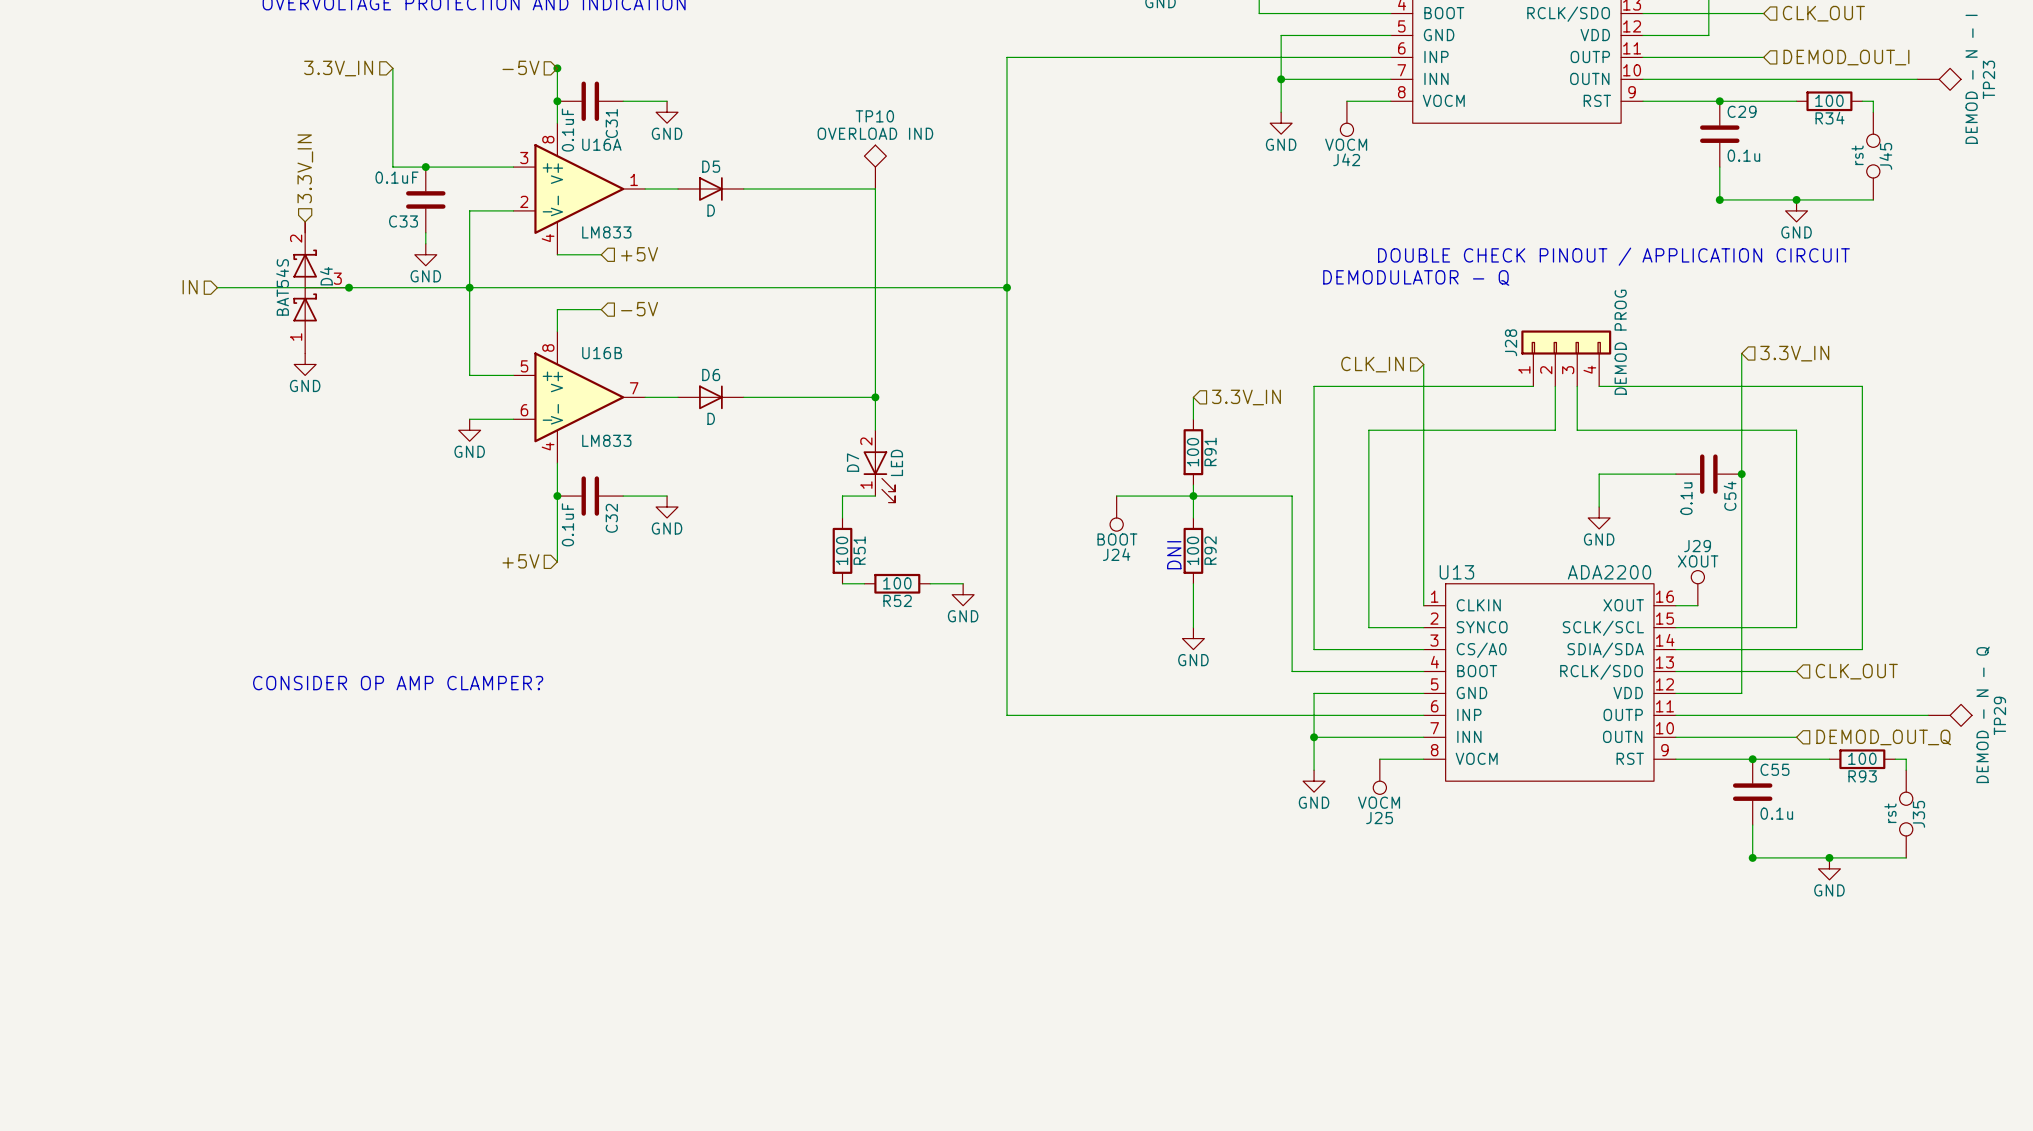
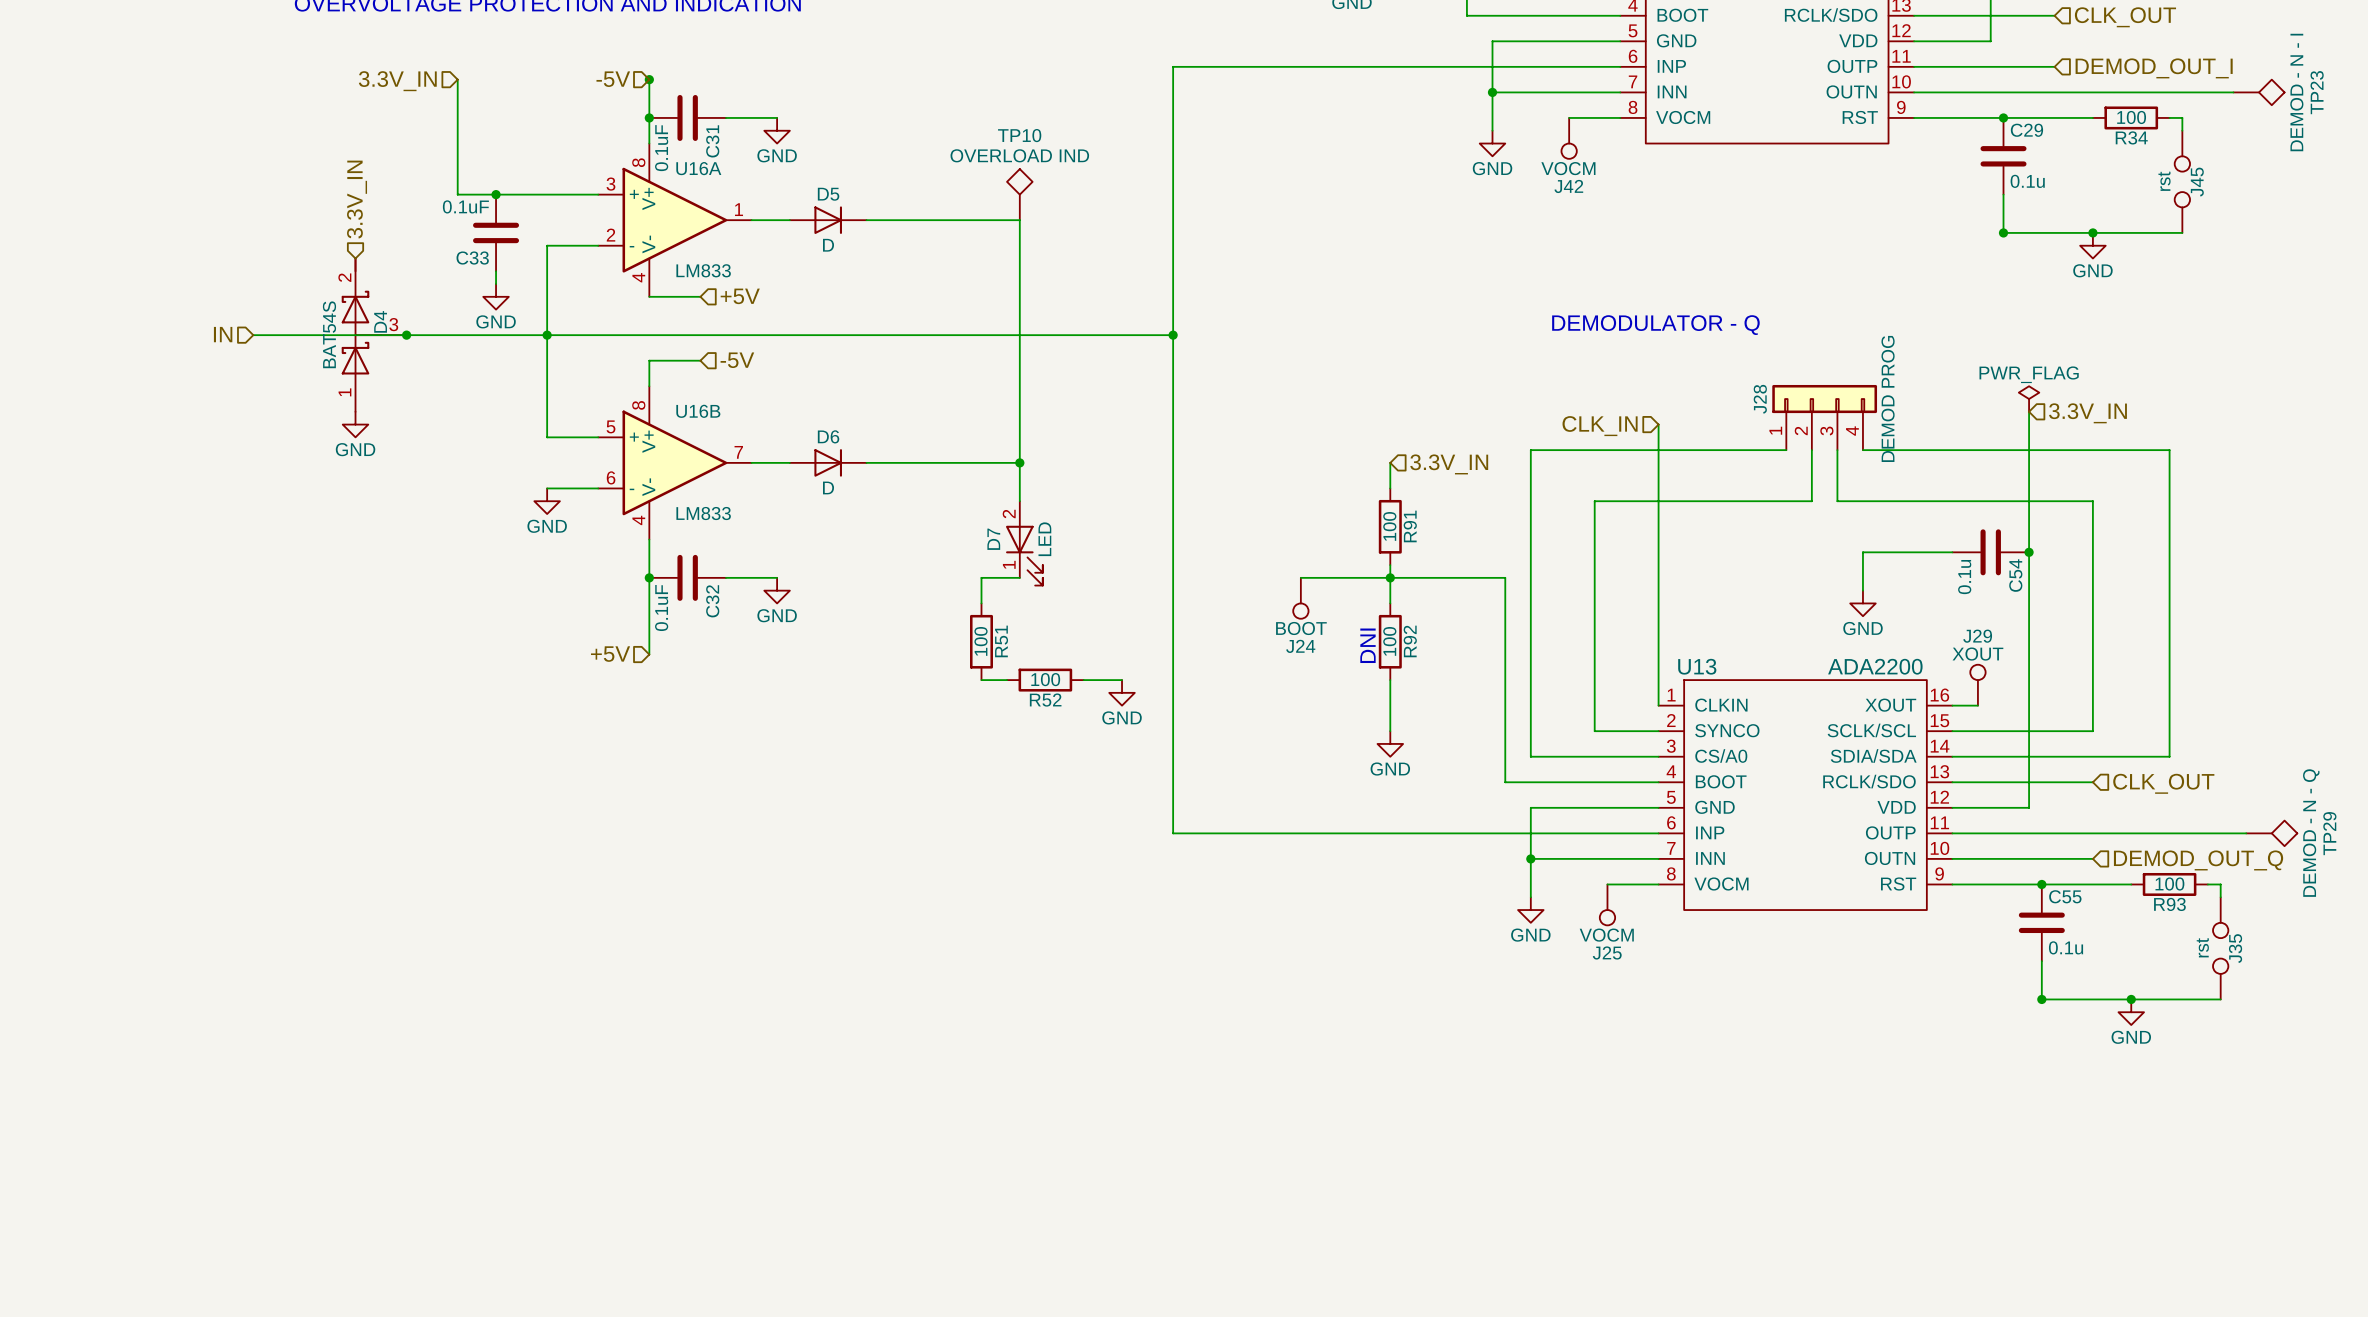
text: DOUBLE CHECK PINOUT / APPLICATION CIRCUIT (1613, 256) -> none
power symbol: none -> PWR_FLAG (2029, 399)
text: CONSIDER OP AMP CLAMPER? (398, 683) -> none

